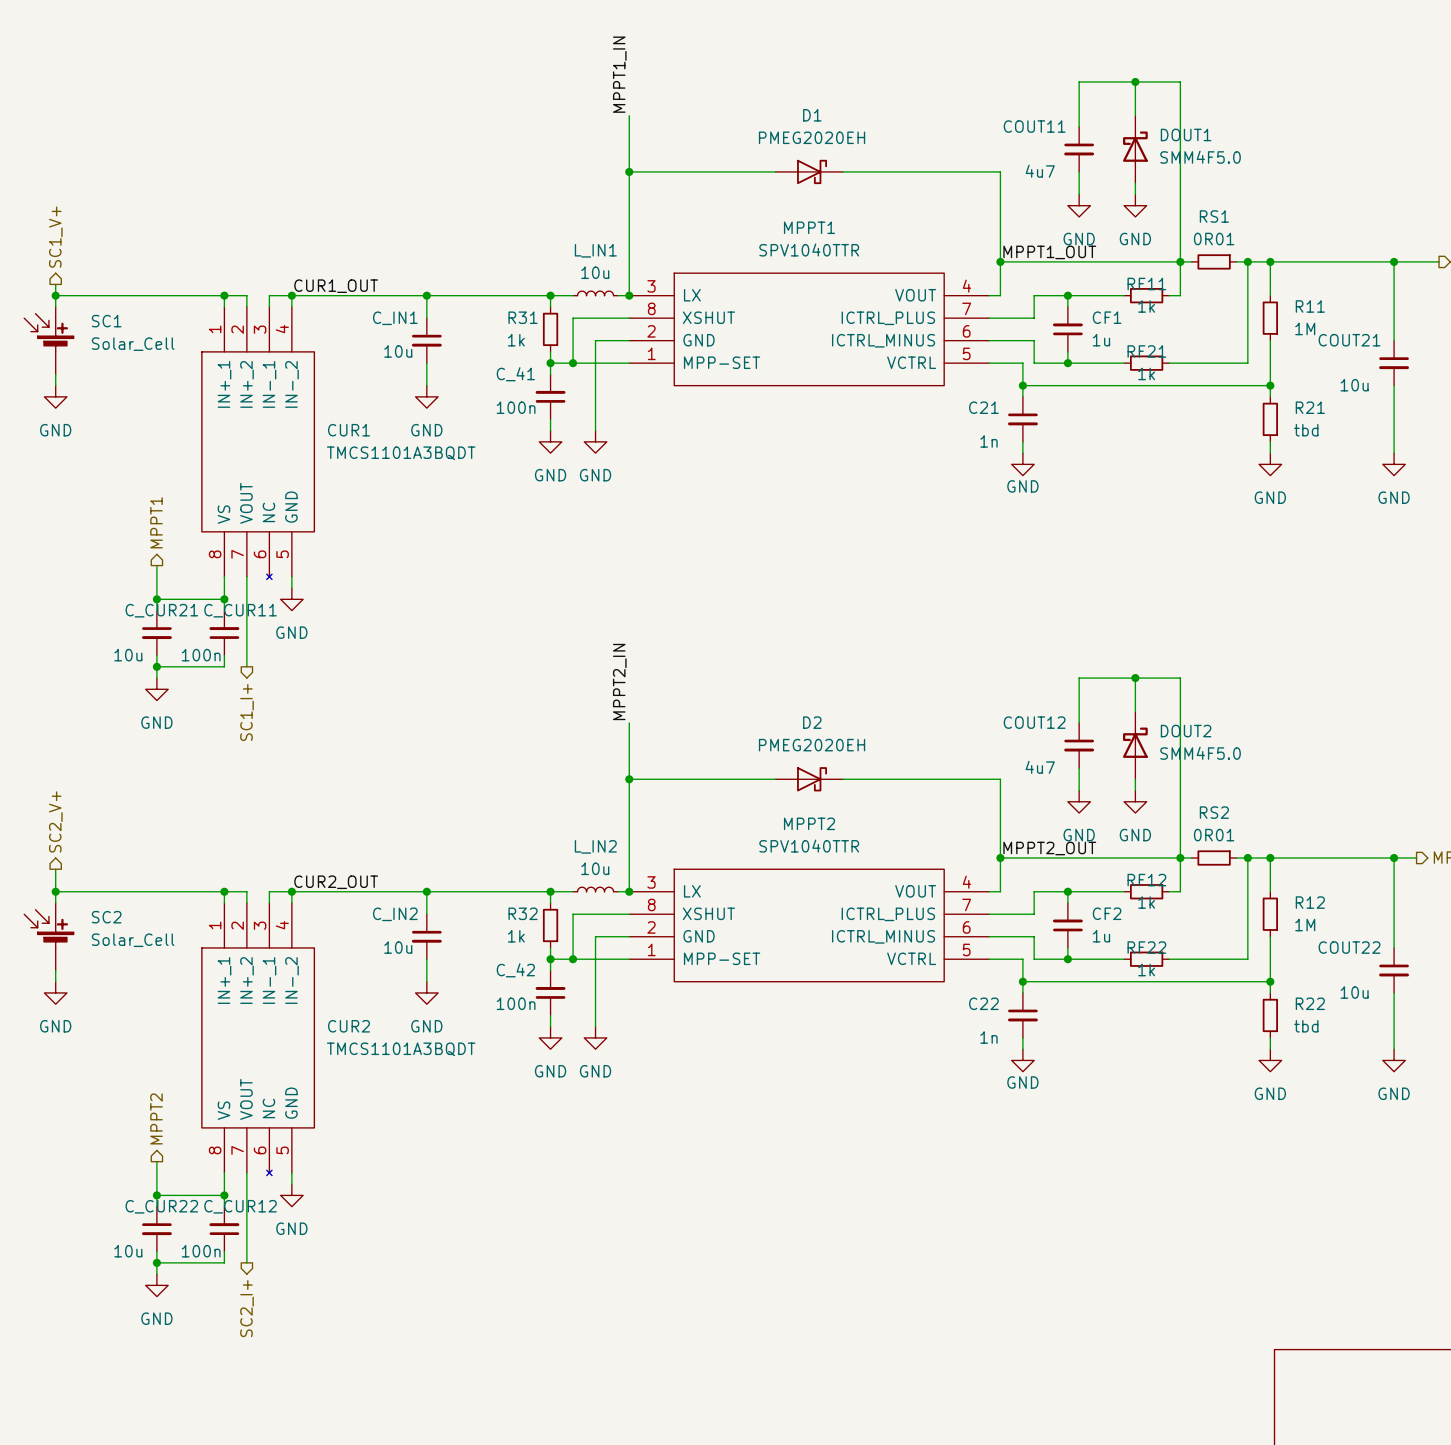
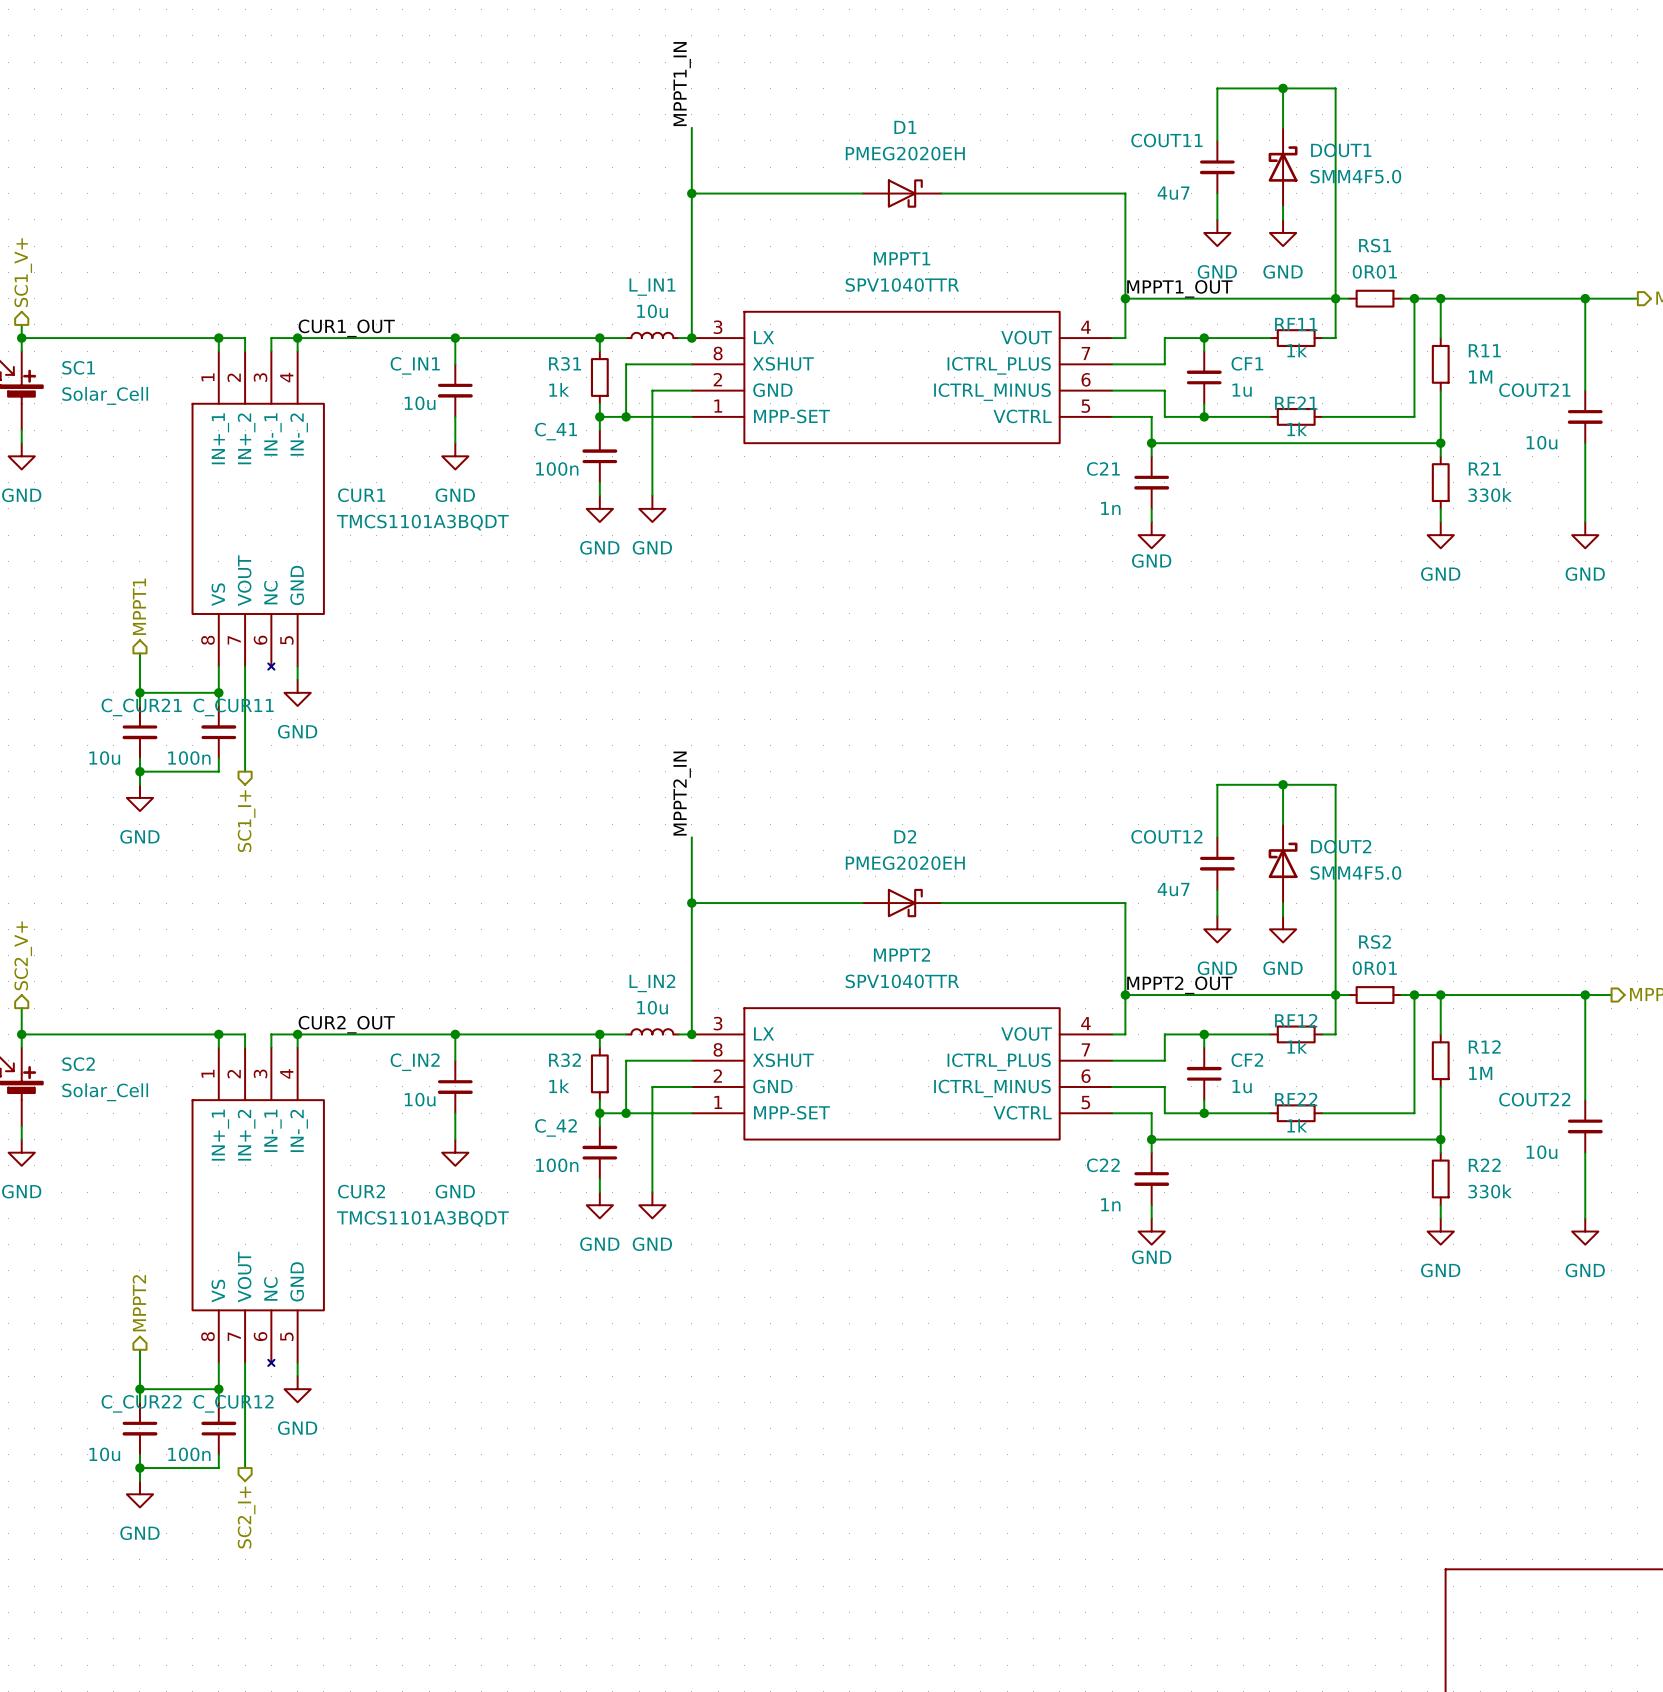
R21 value: tbd (1306, 430) -> 330k (1490, 495)
R22 value: tbd (1306, 1026) -> 330k (1490, 1191)

